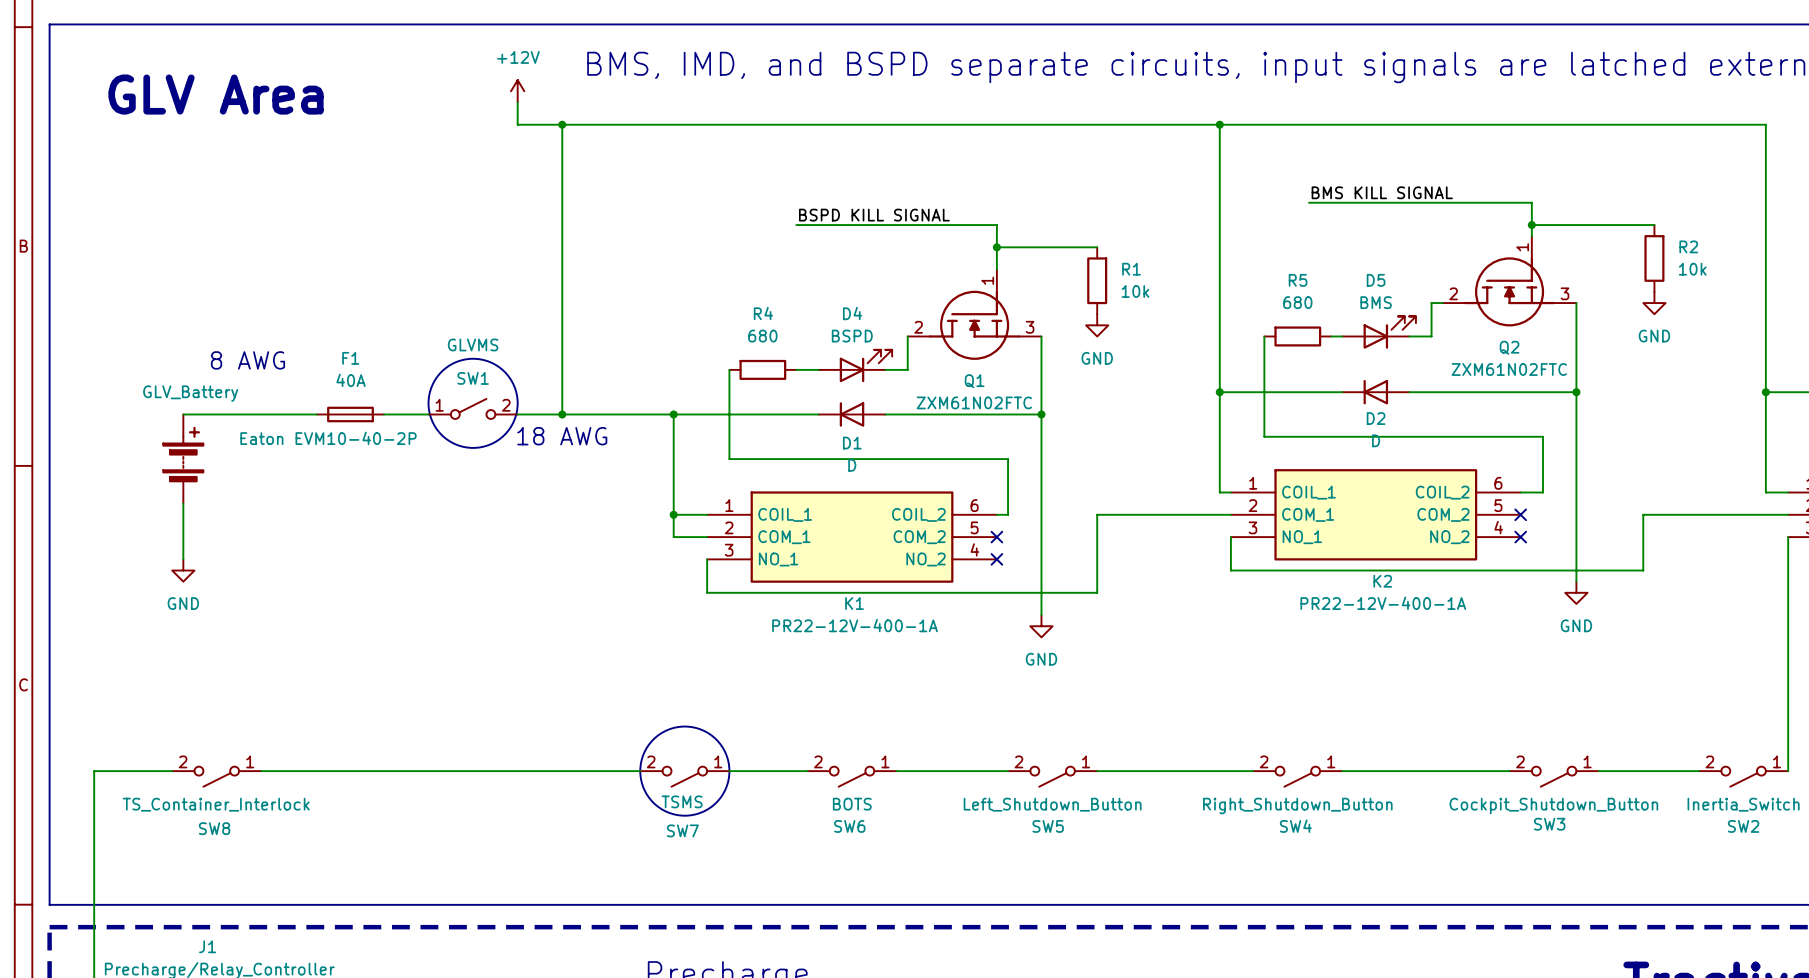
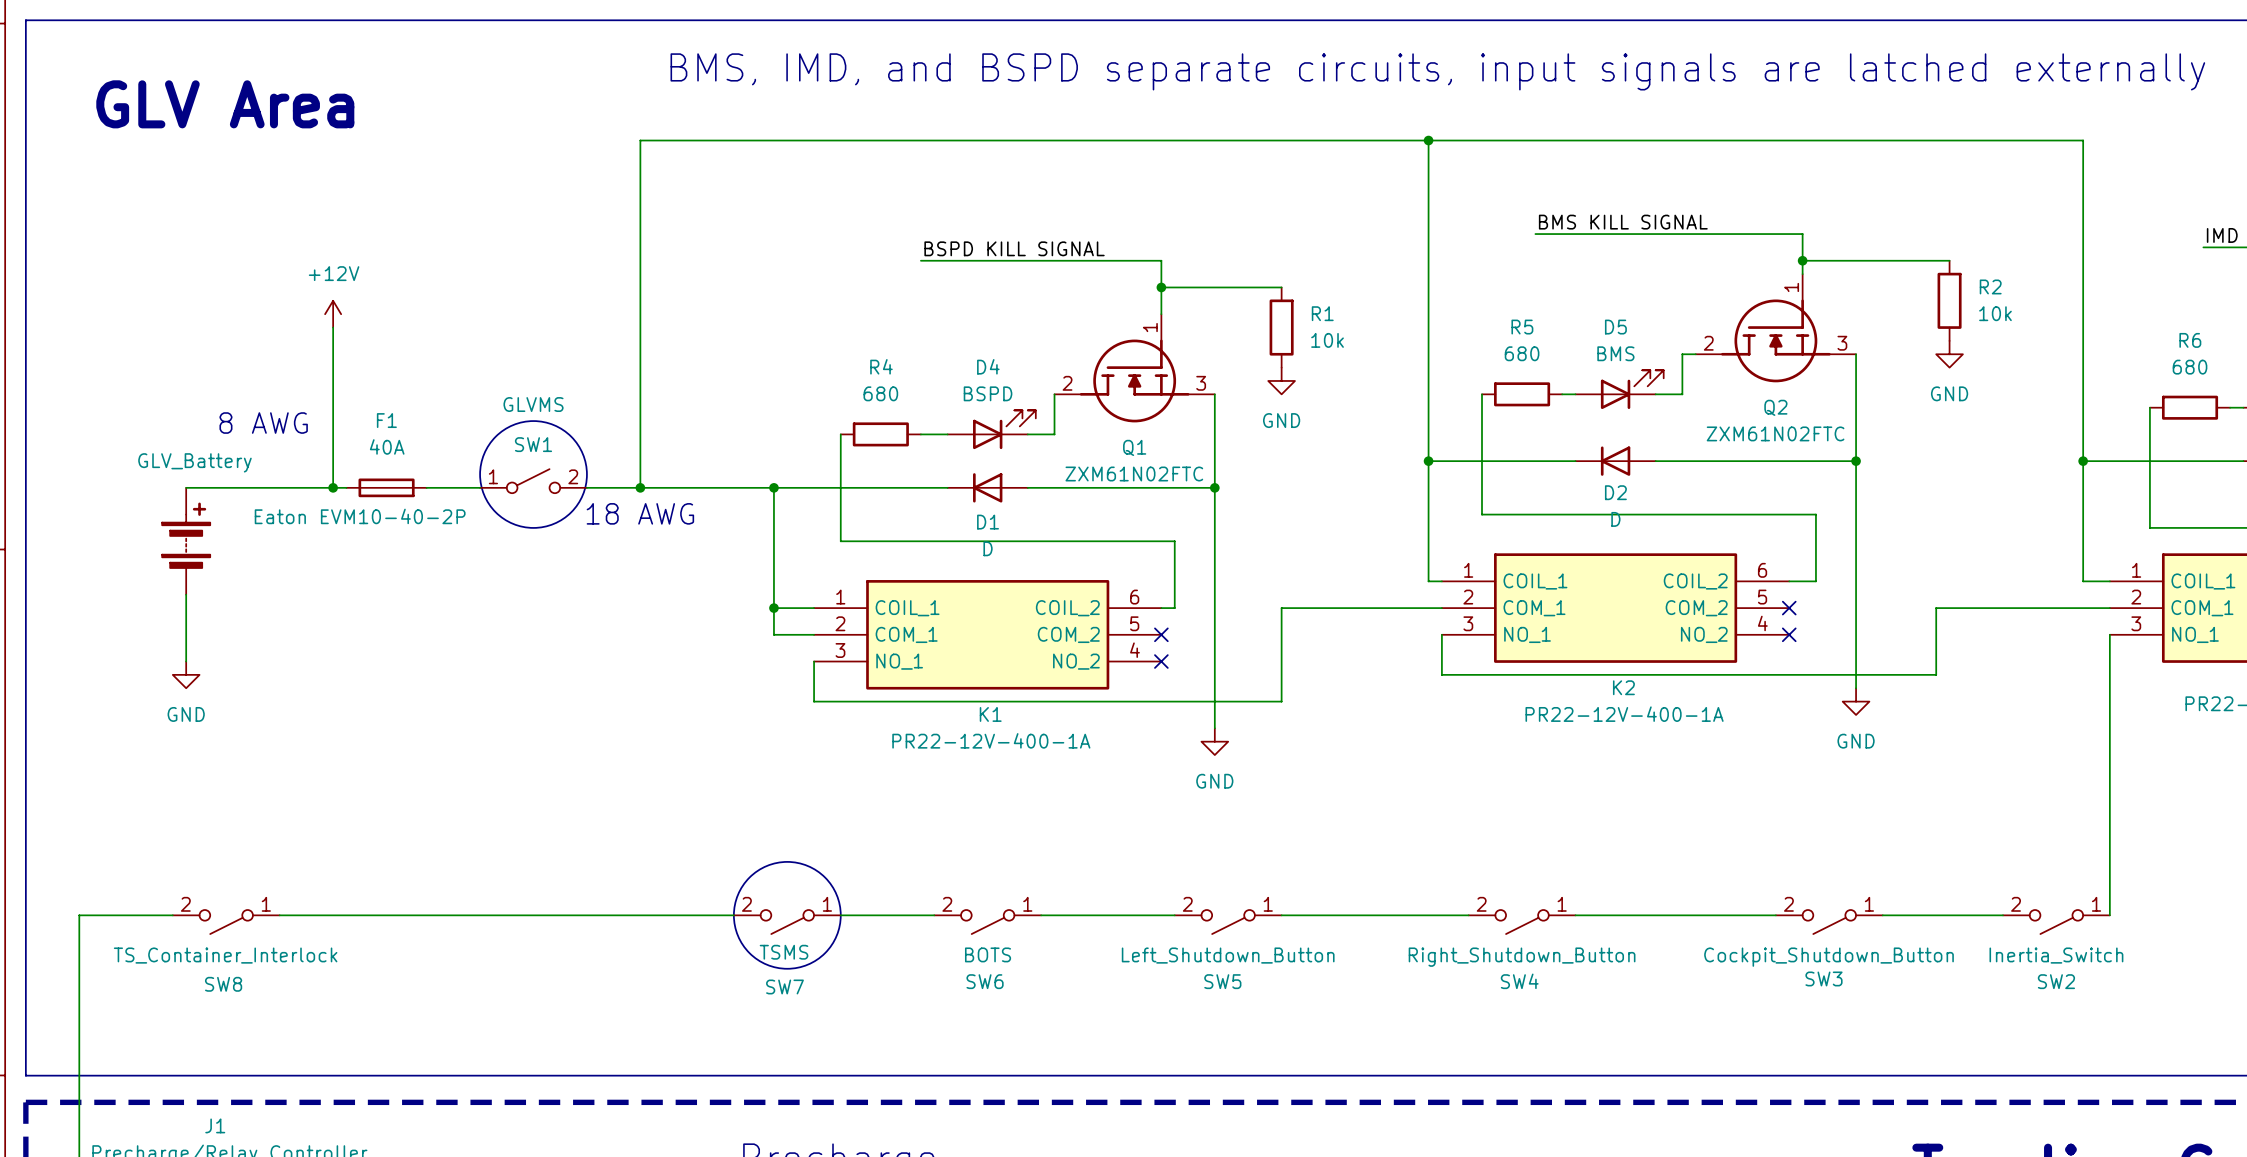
power symbol: +12V (517, 91) -> none
wire: (517, 102) (517, 124) (562, 124) -> none
junction: (562, 124) -> none
power symbol: none -> +12V (333, 314)
wire: none -> (333, 327) (333, 487)
junction: none -> (333, 487)

